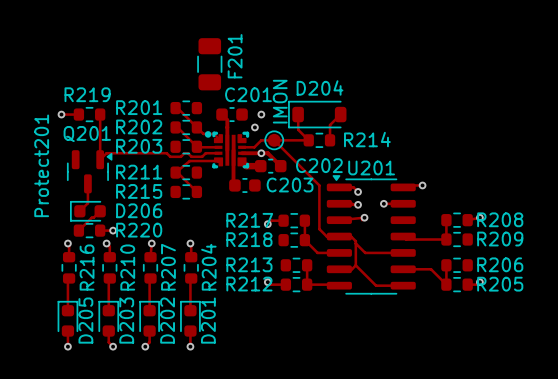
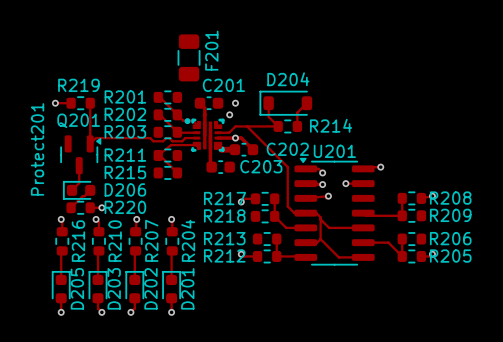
IMON: (274, 140) -> none

